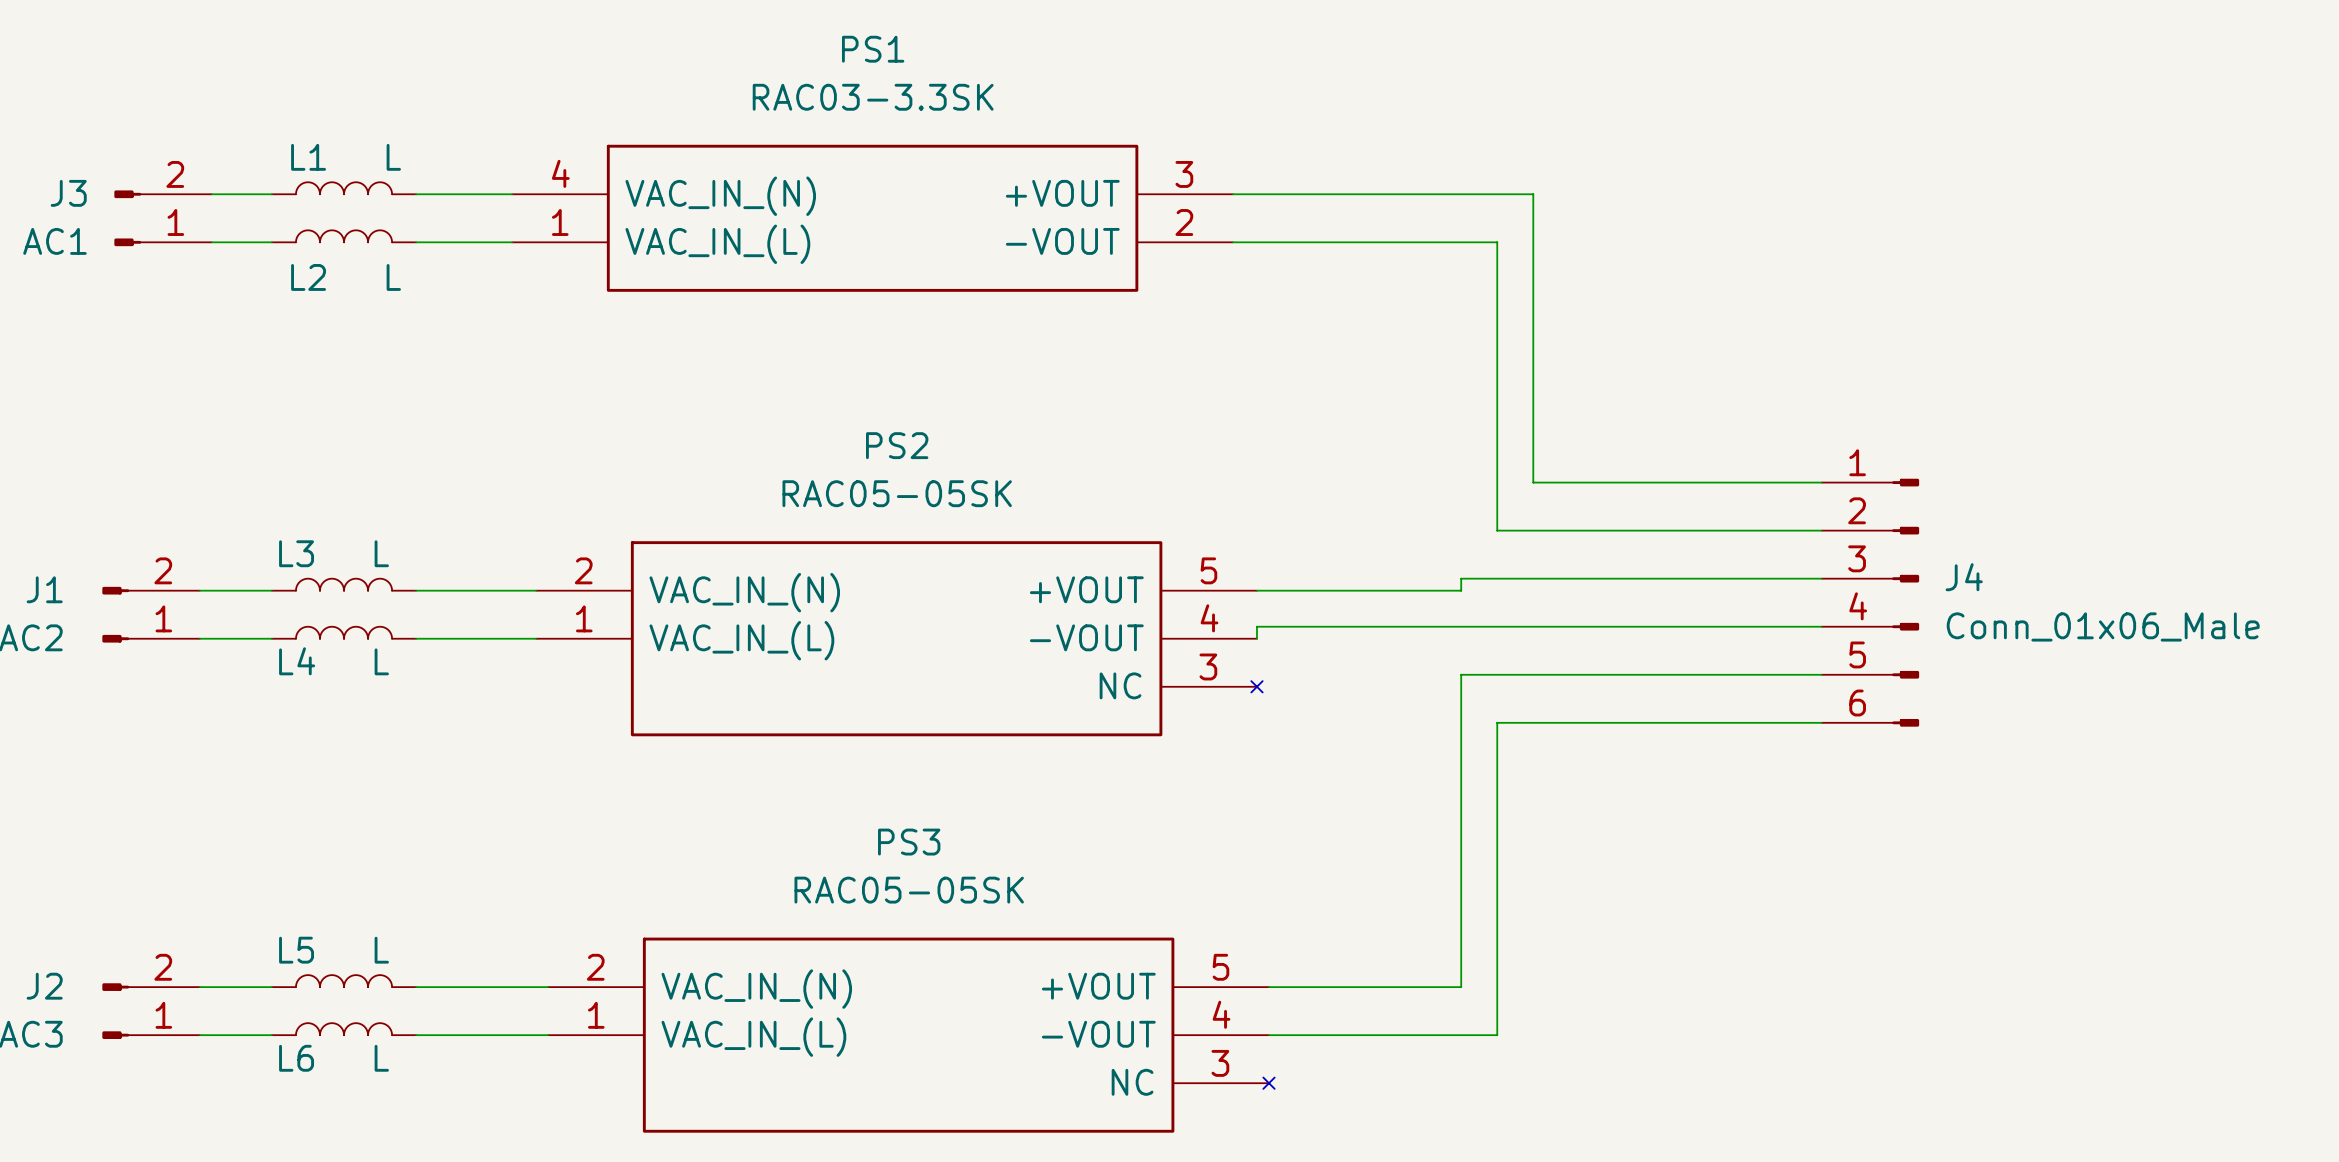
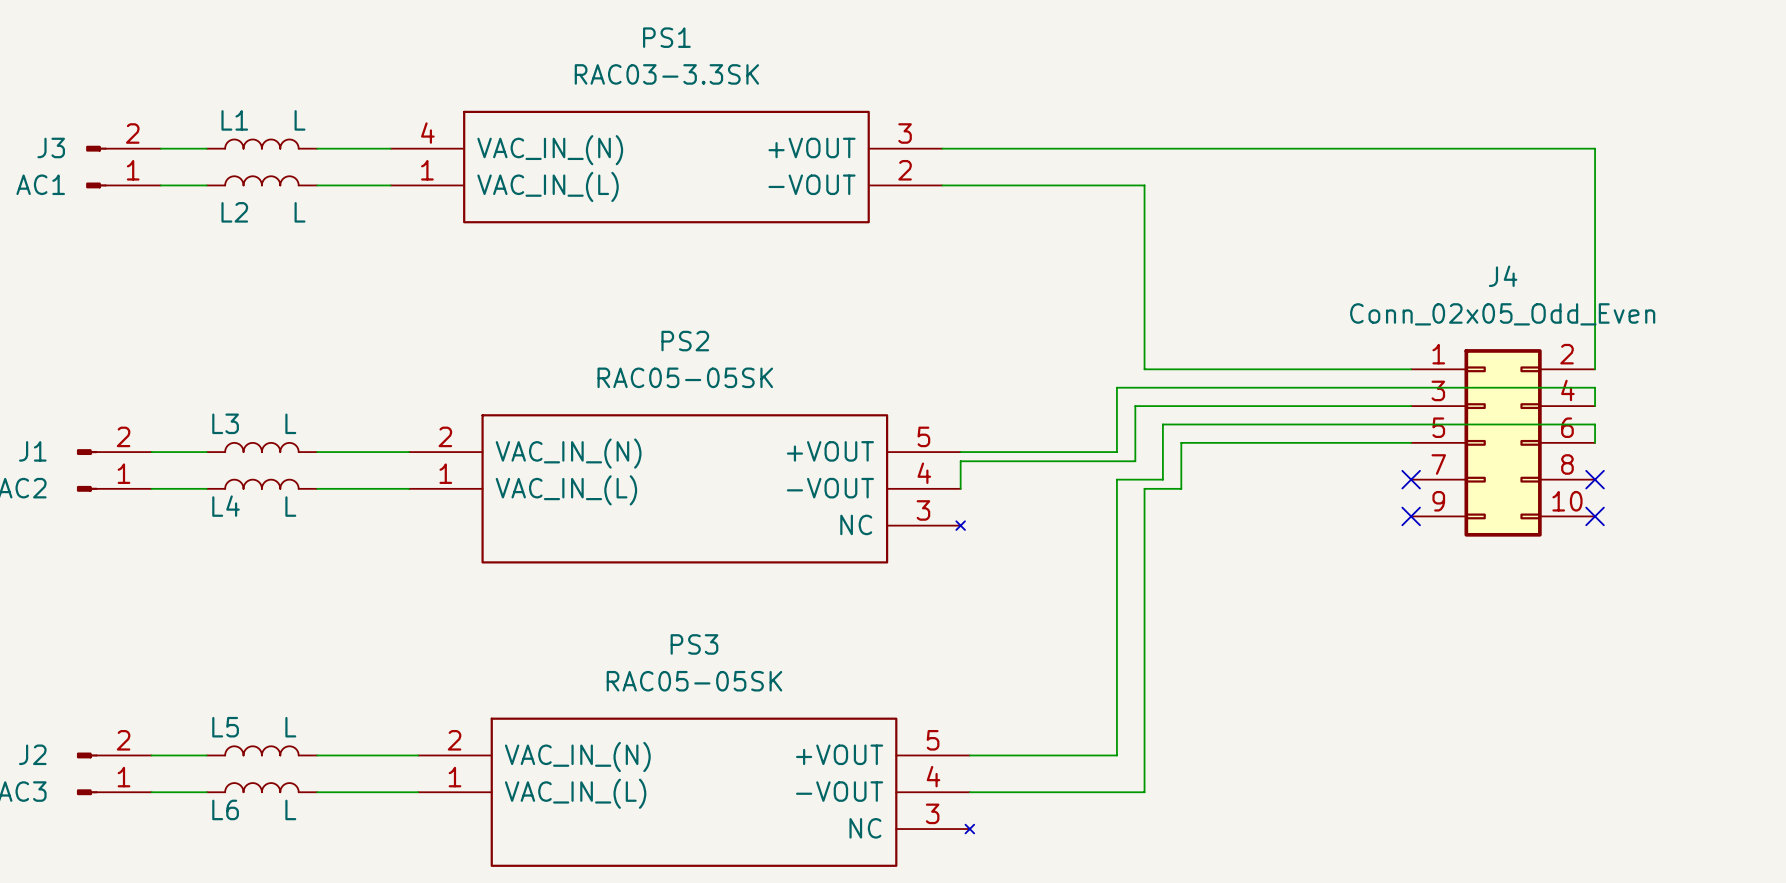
wire: (1533, 194) (1533, 482) -> (1172, 148) (1595, 148) (1595, 369)
J4 symbol: [1821, 478, 1920, 727] -> [1411, 349, 1596, 537]
wire: (1497, 482) (1497, 530) -> (1144, 369) (1172, 369)
wire: none -> (1595, 406) (1595, 387) (1116, 387) (1116, 442)
J4 name position: J4 (1964, 577) -> J4 (1503, 276)
wire: (1461, 578) (1545, 578) -> (1144, 553) (1144, 488) (1181, 488) (1181, 442)
wire: (1256, 626) (1461, 626) -> (960, 479) (960, 461) (1135, 461) (1135, 406) (1144, 406)
wire: (1521, 626) (1821, 626) -> (1162, 479) (1162, 424) (1595, 424) (1595, 442)
no-connect mark: none -> (1411, 479)
no-connect mark: none -> (1595, 479)
J4 value: Conn_01x06_Male (2103, 626) -> Conn_02x05_Odd_Even (1502, 314)
wire: (1461, 674) (1821, 674) -> (1116, 516) (1116, 479)
no-connect mark: none -> (1411, 516)
no-connect mark: none -> (1595, 516)
wire: (1497, 722) (1821, 722) -> none

